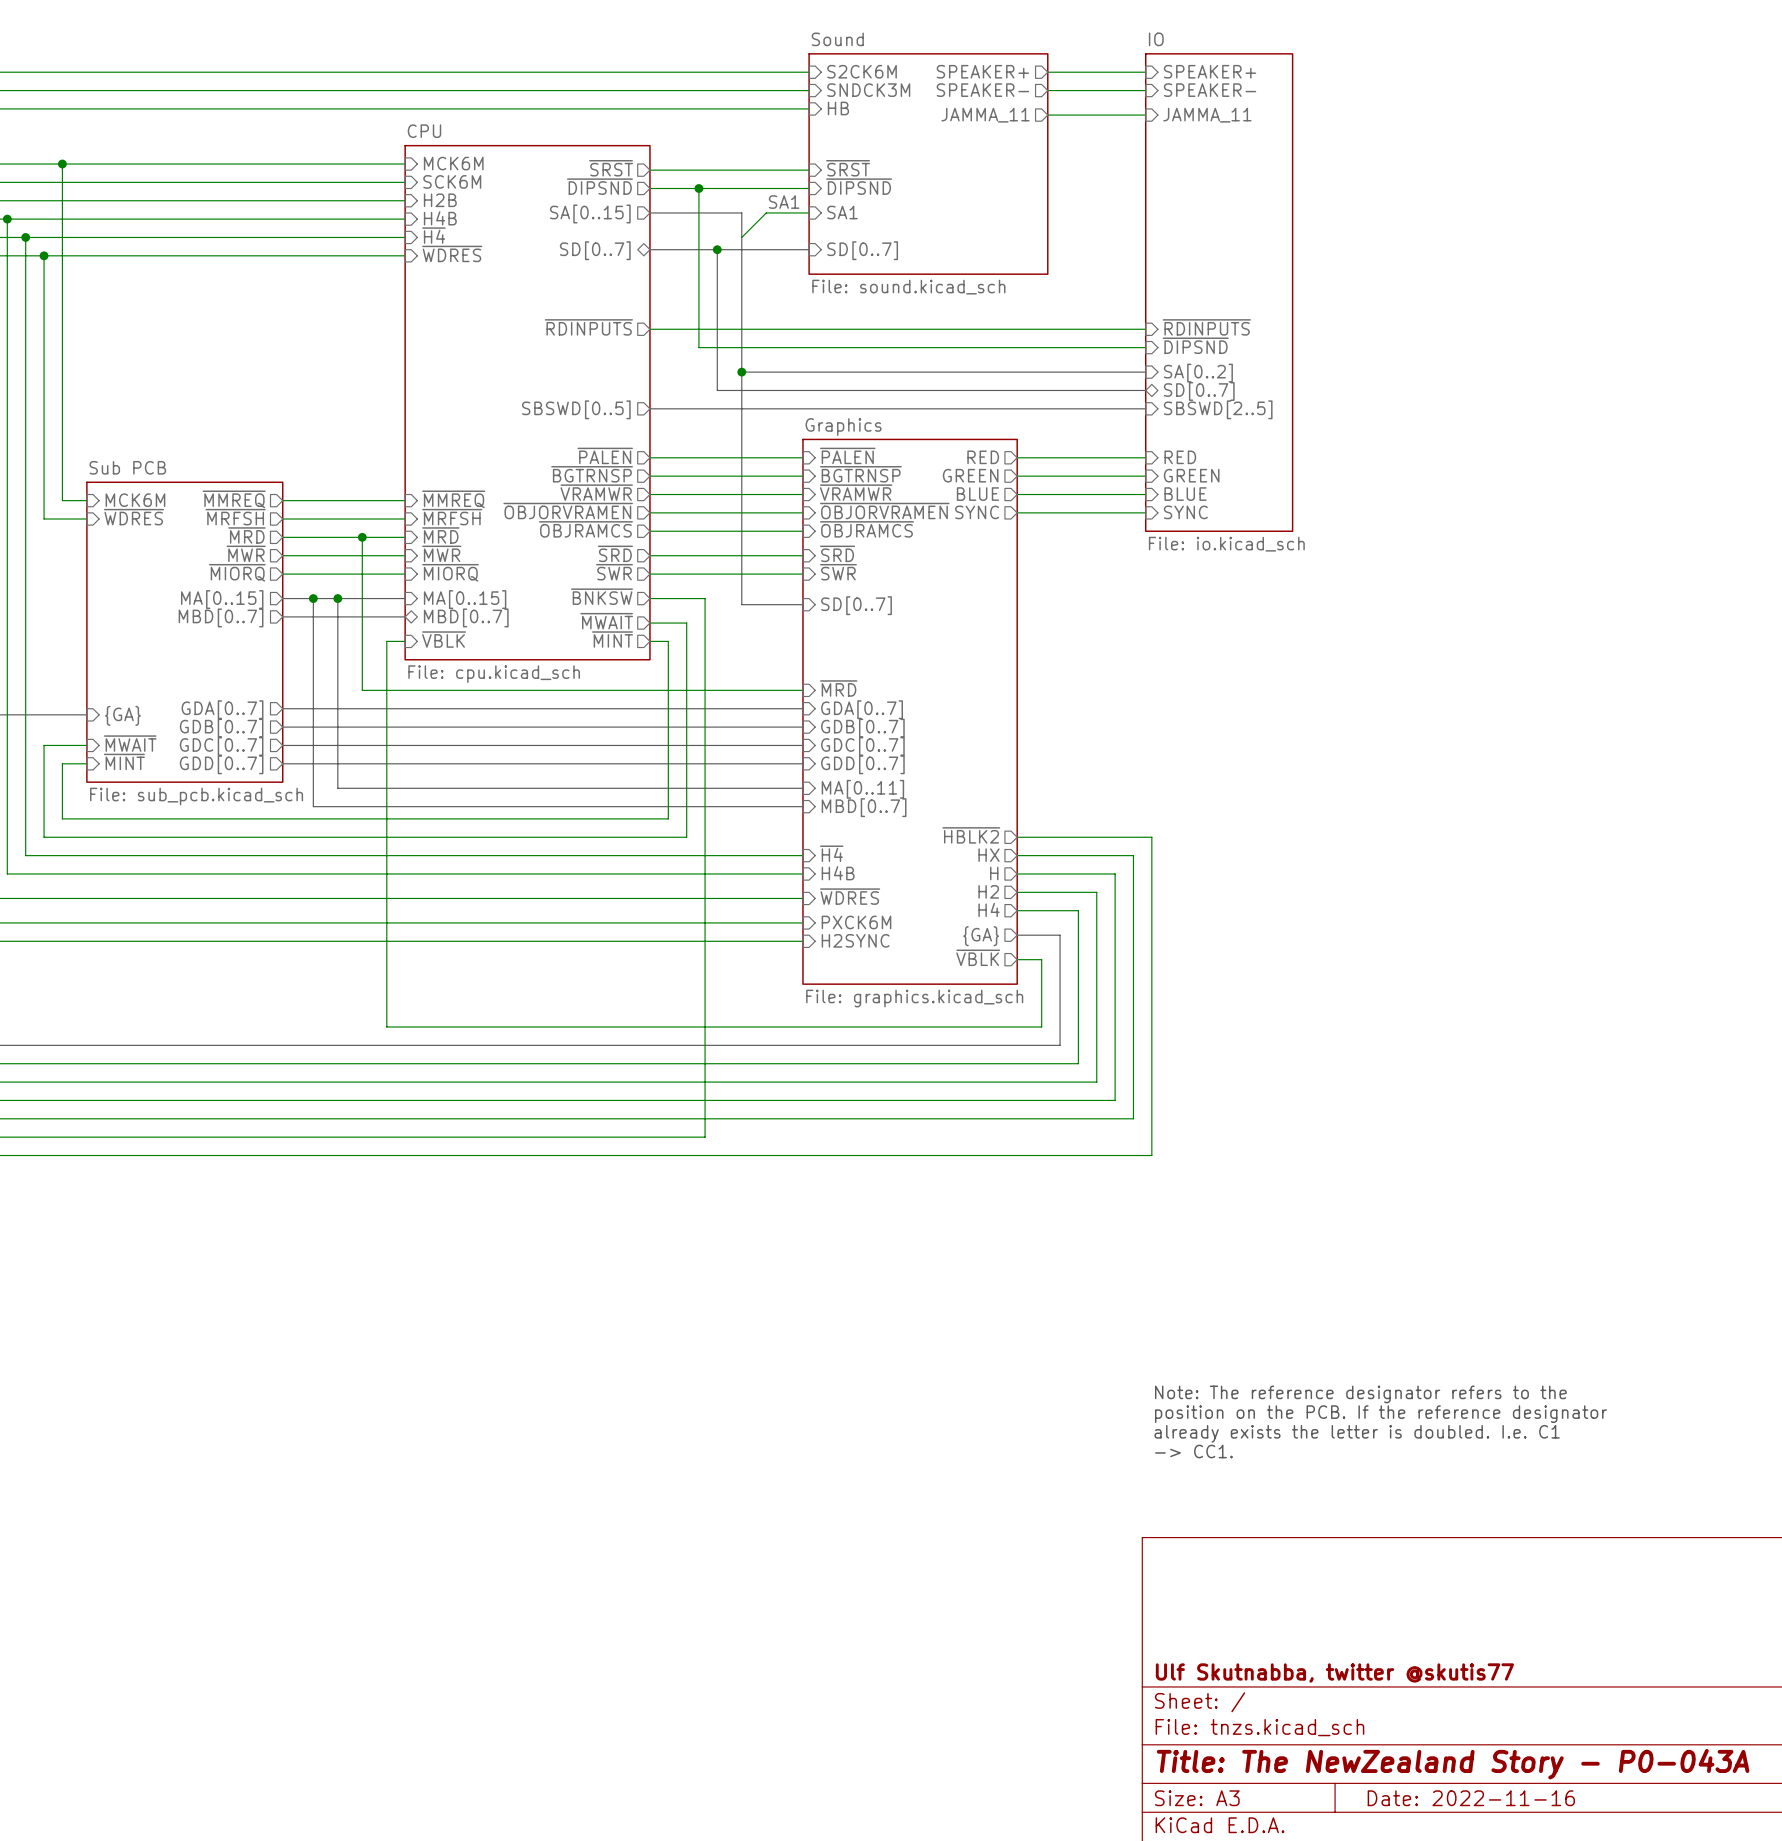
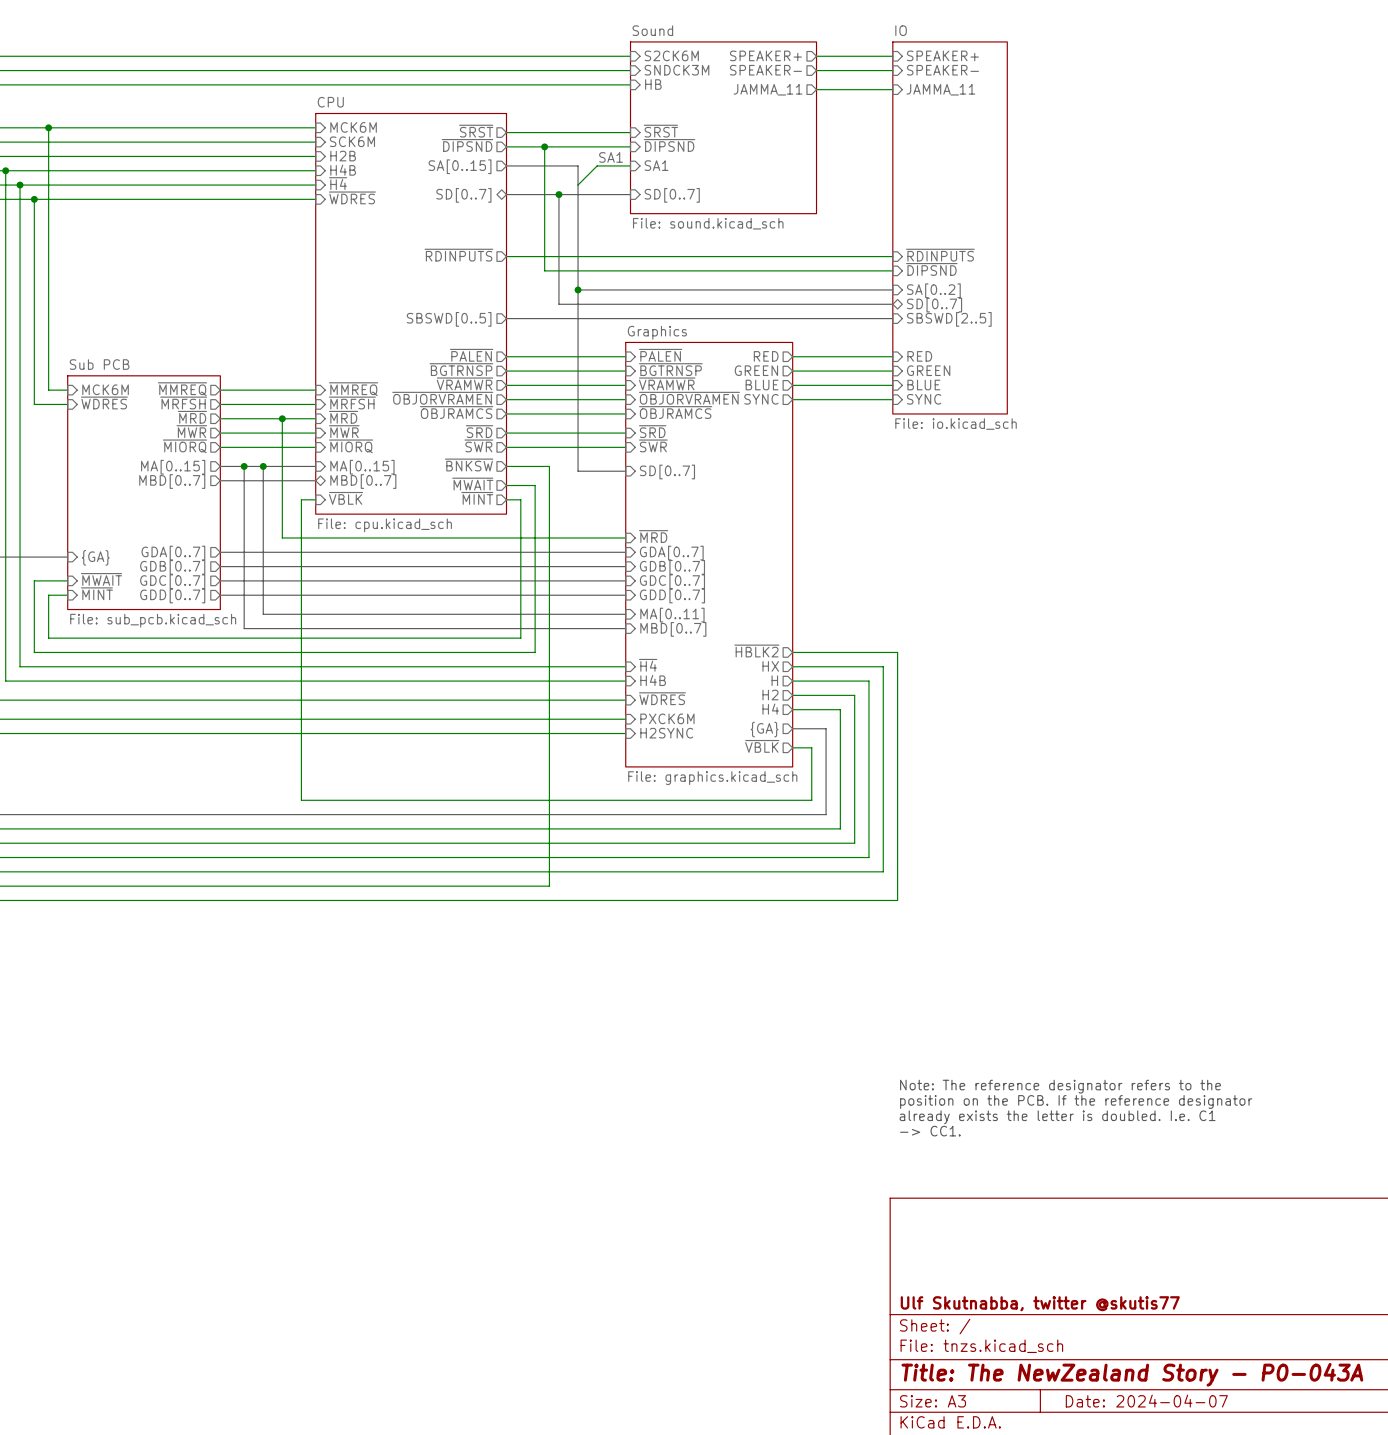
title block: Date: 2022-11-16 (1471, 1798) -> Date: 2024-04-07 (1146, 1401)

